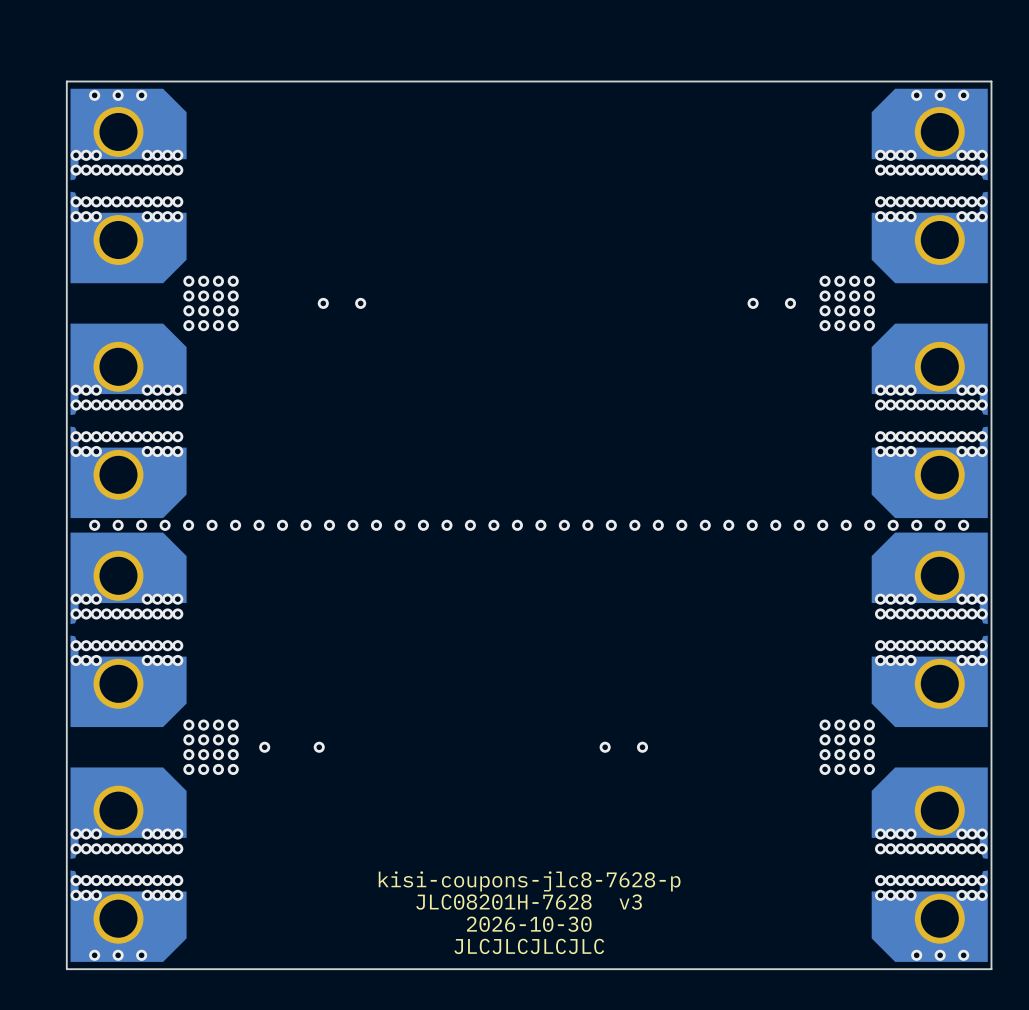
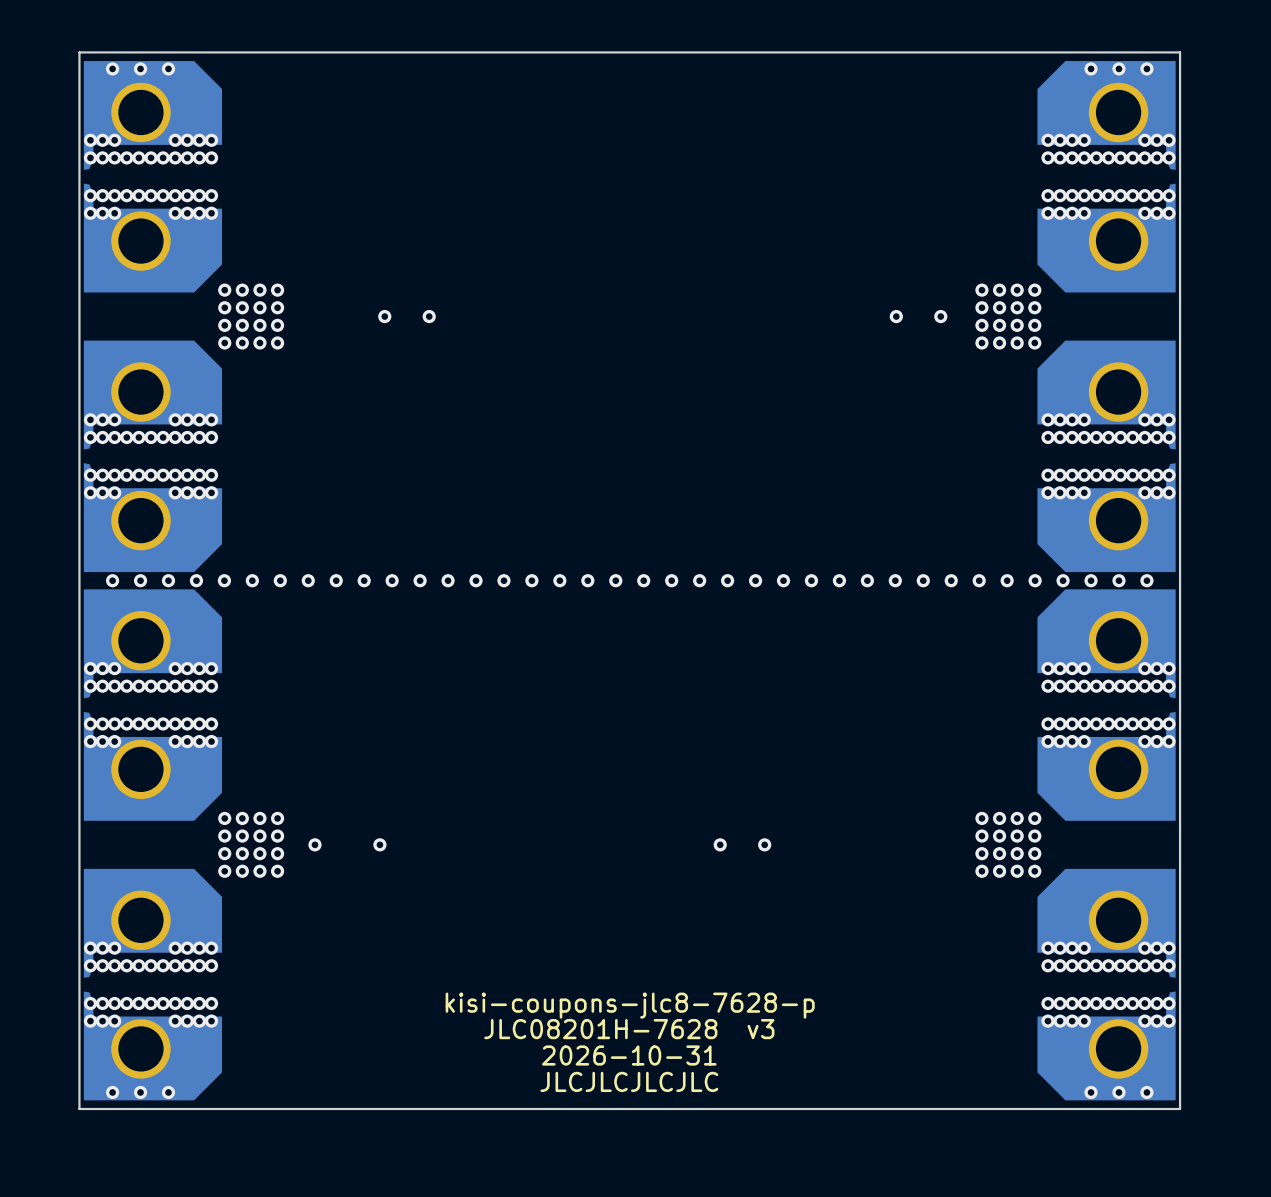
text: 2026-10-30 (529, 924) -> 2026-10-31 (629, 1055)

